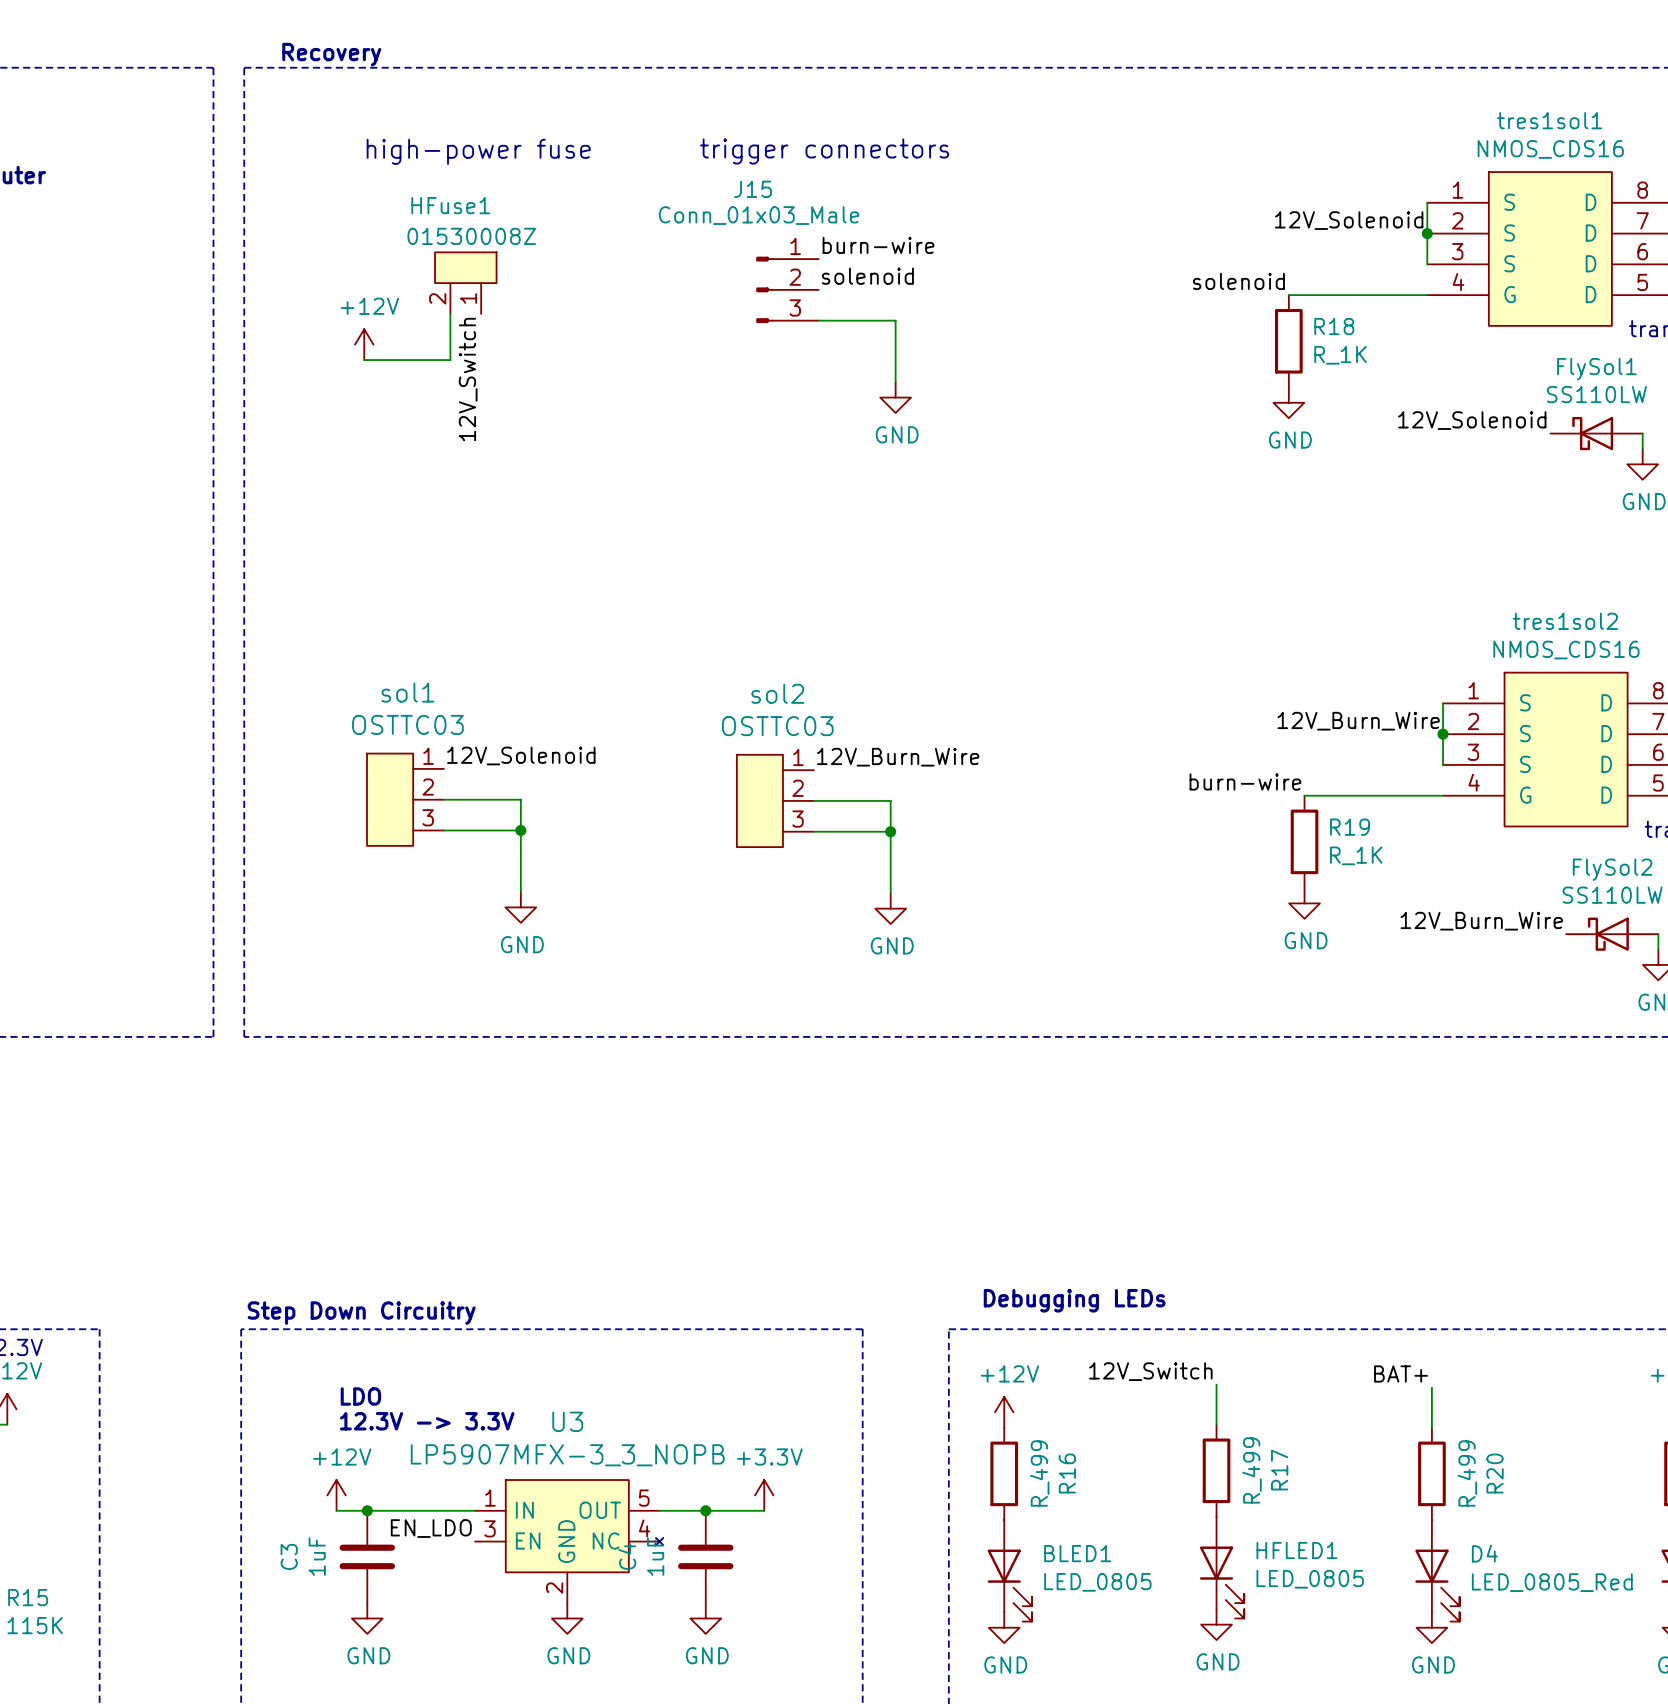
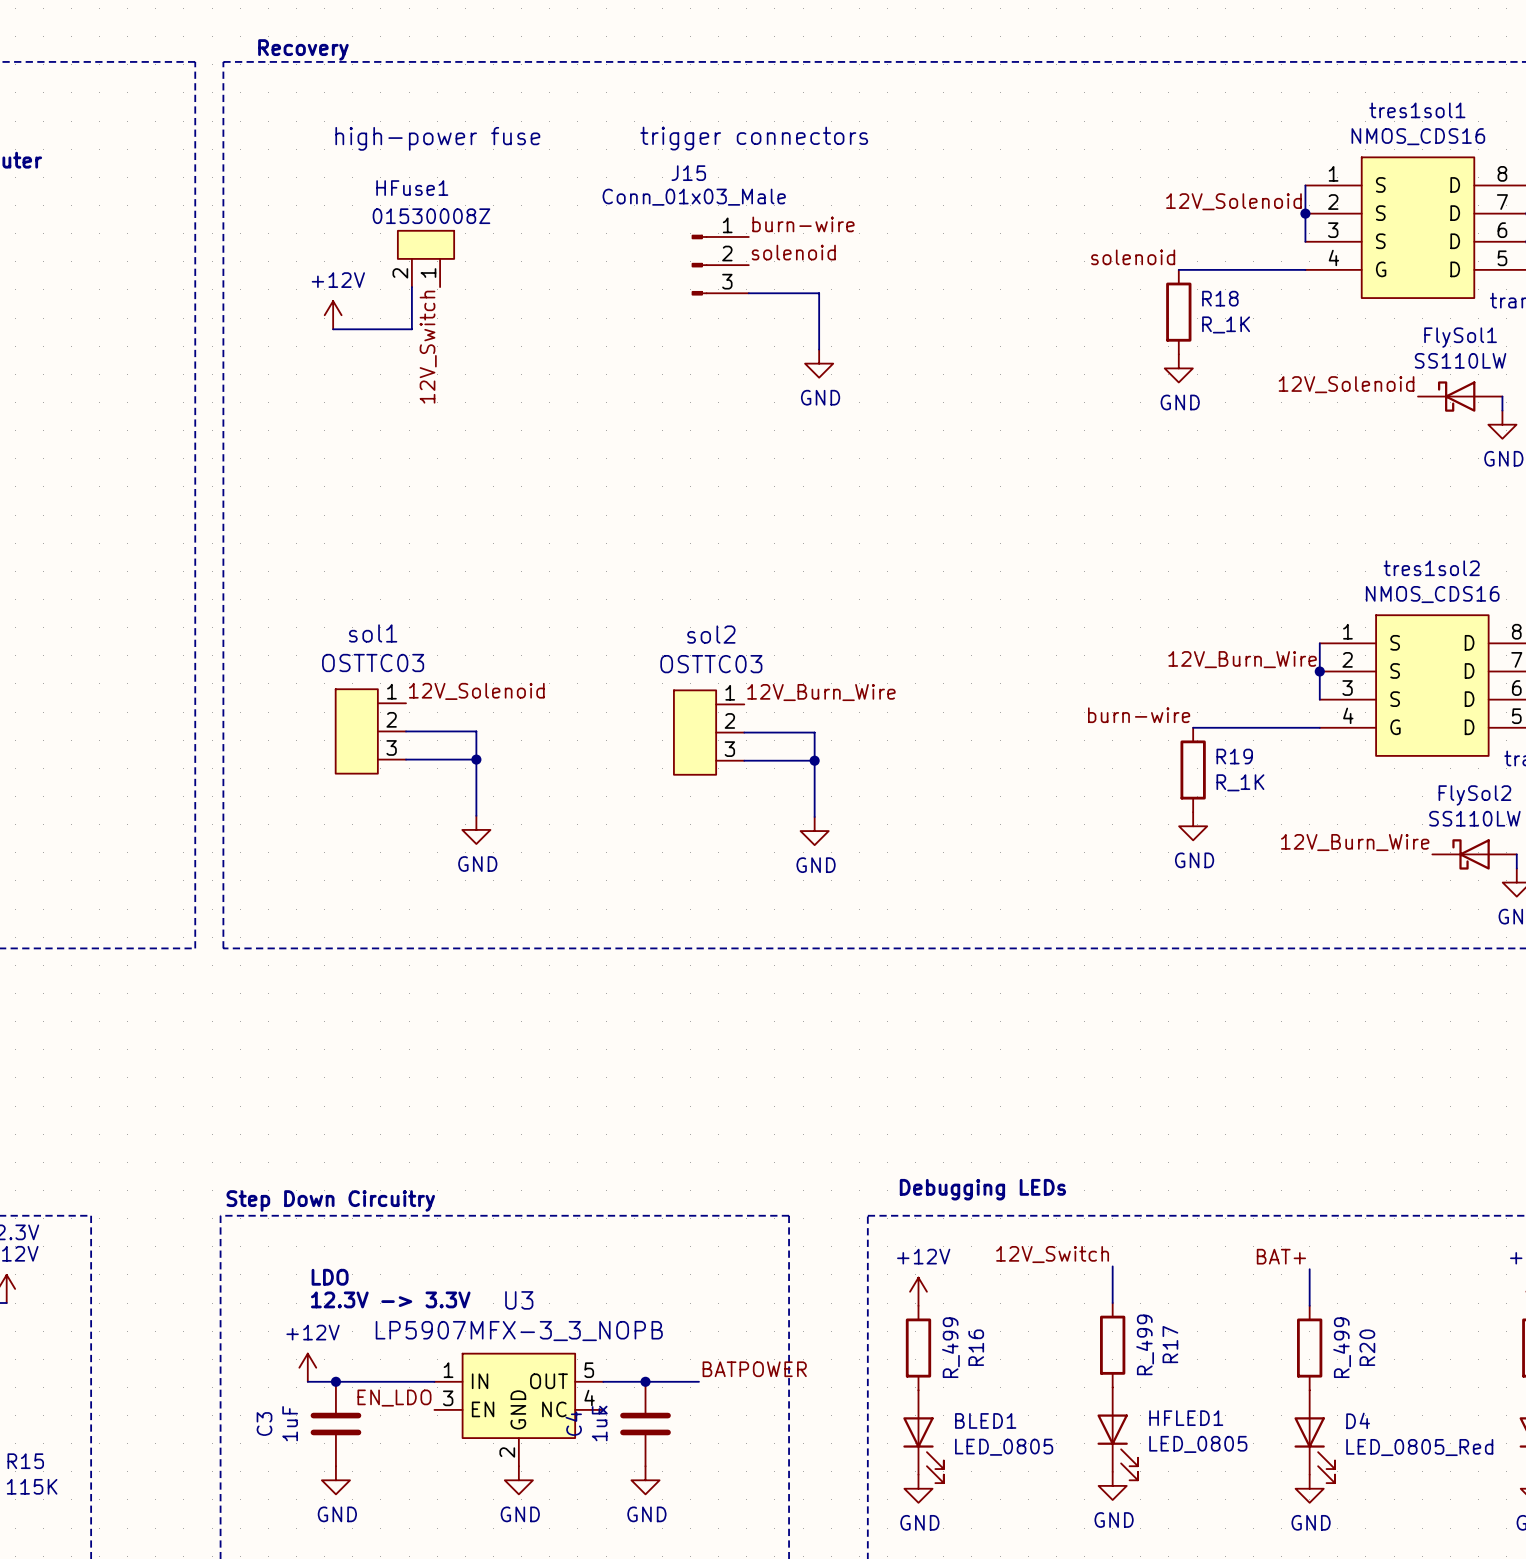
power symbol: +3.3V (764, 1495) -> none
label: none -> BATPOWER (754, 1369)

